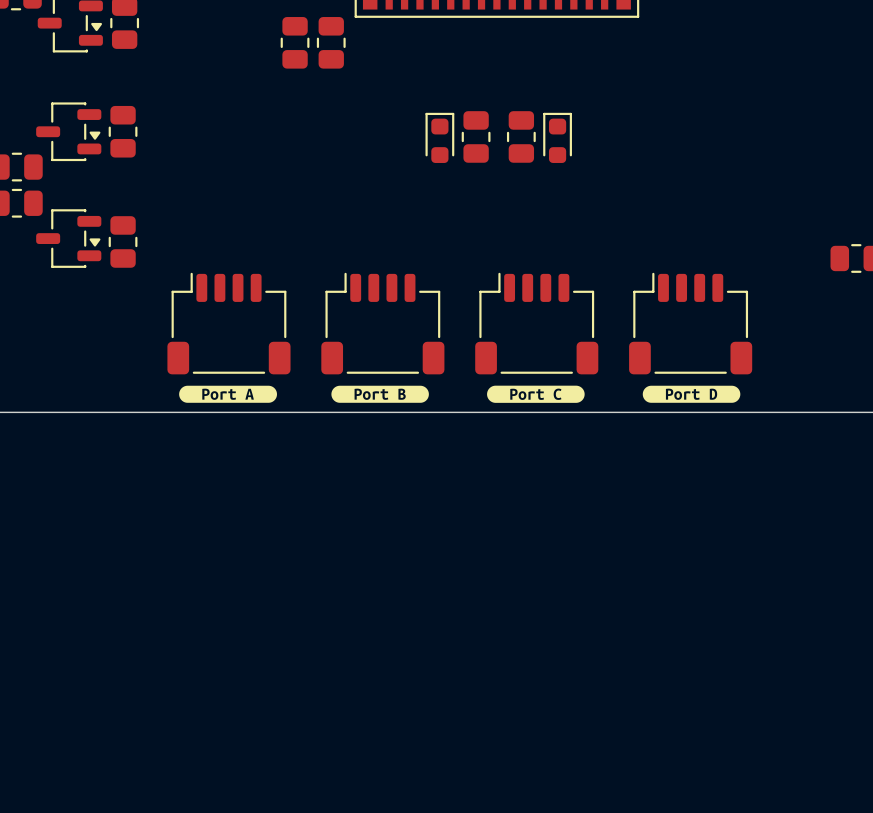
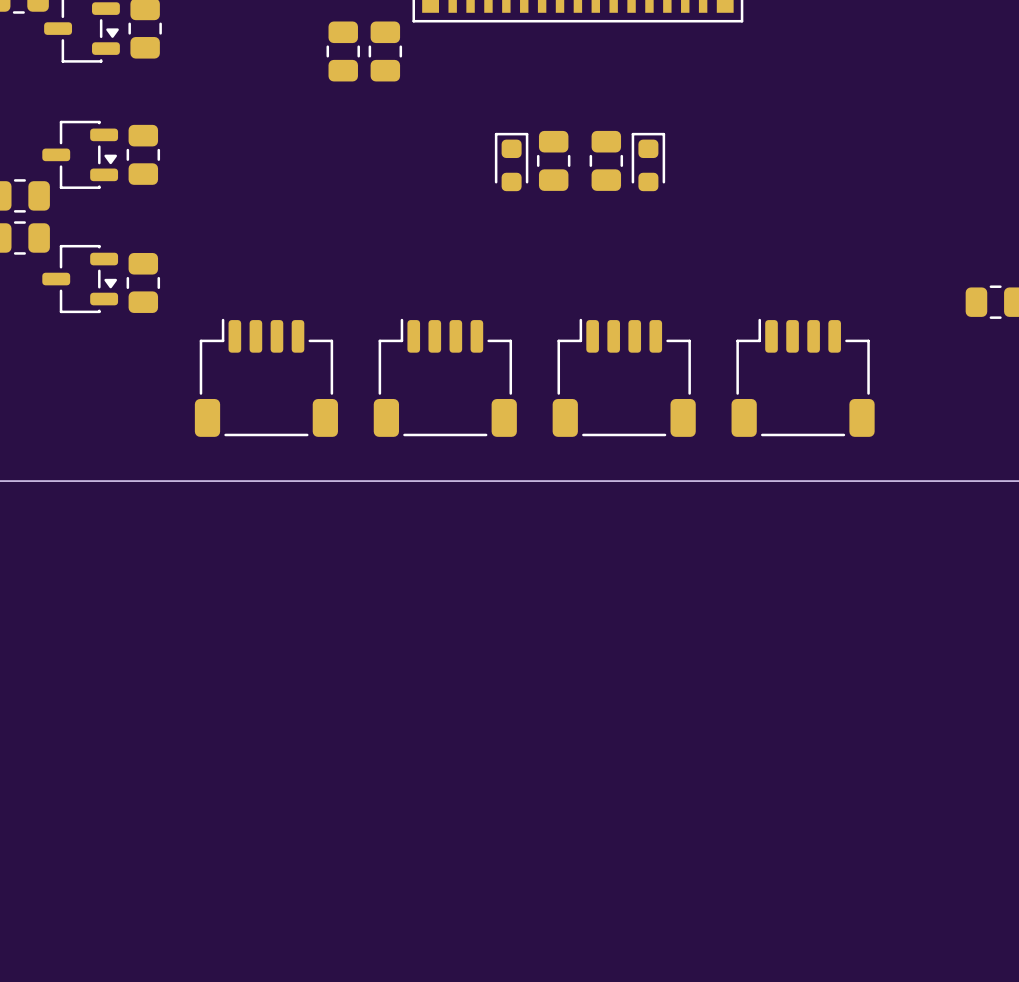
drawing: [179, 385, 277, 403] -> none
drawing: [331, 385, 429, 403] -> none
drawing: [487, 385, 585, 403] -> none
drawing: [642, 385, 741, 403] -> none

